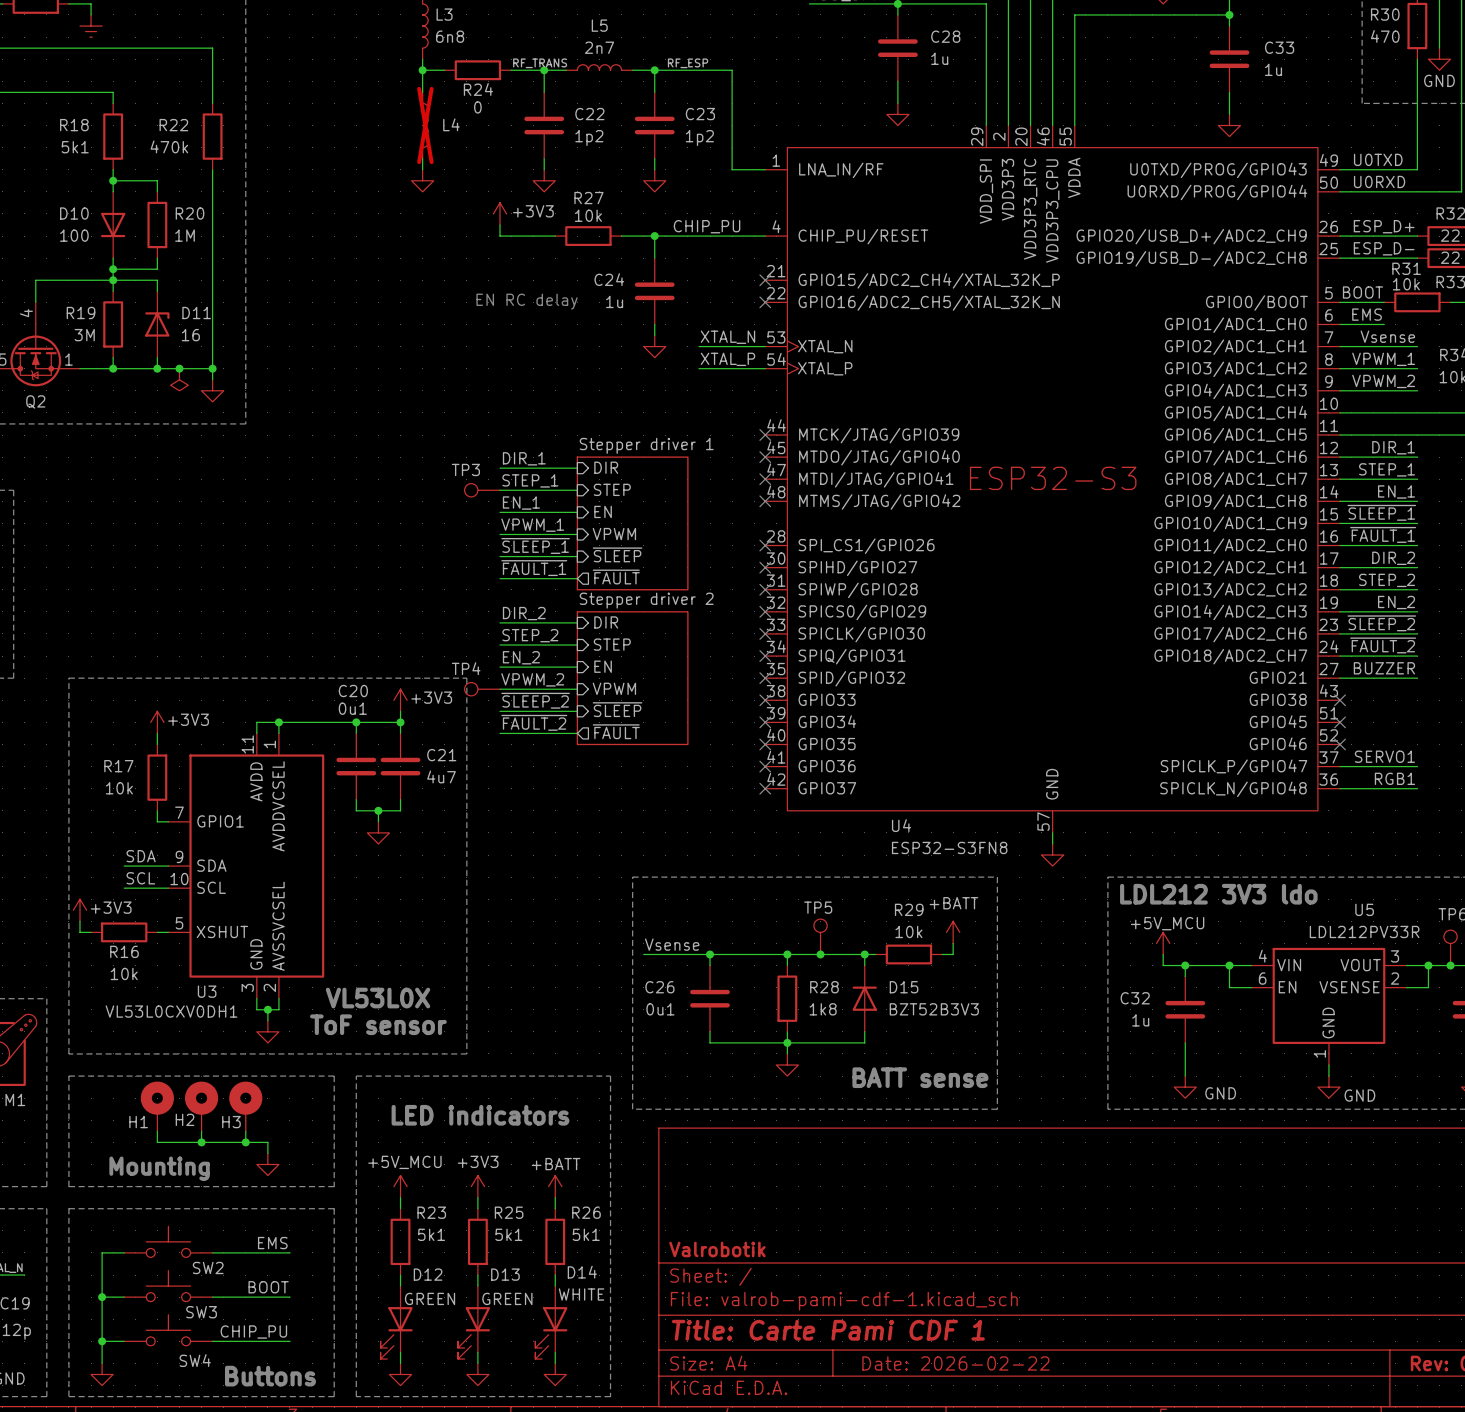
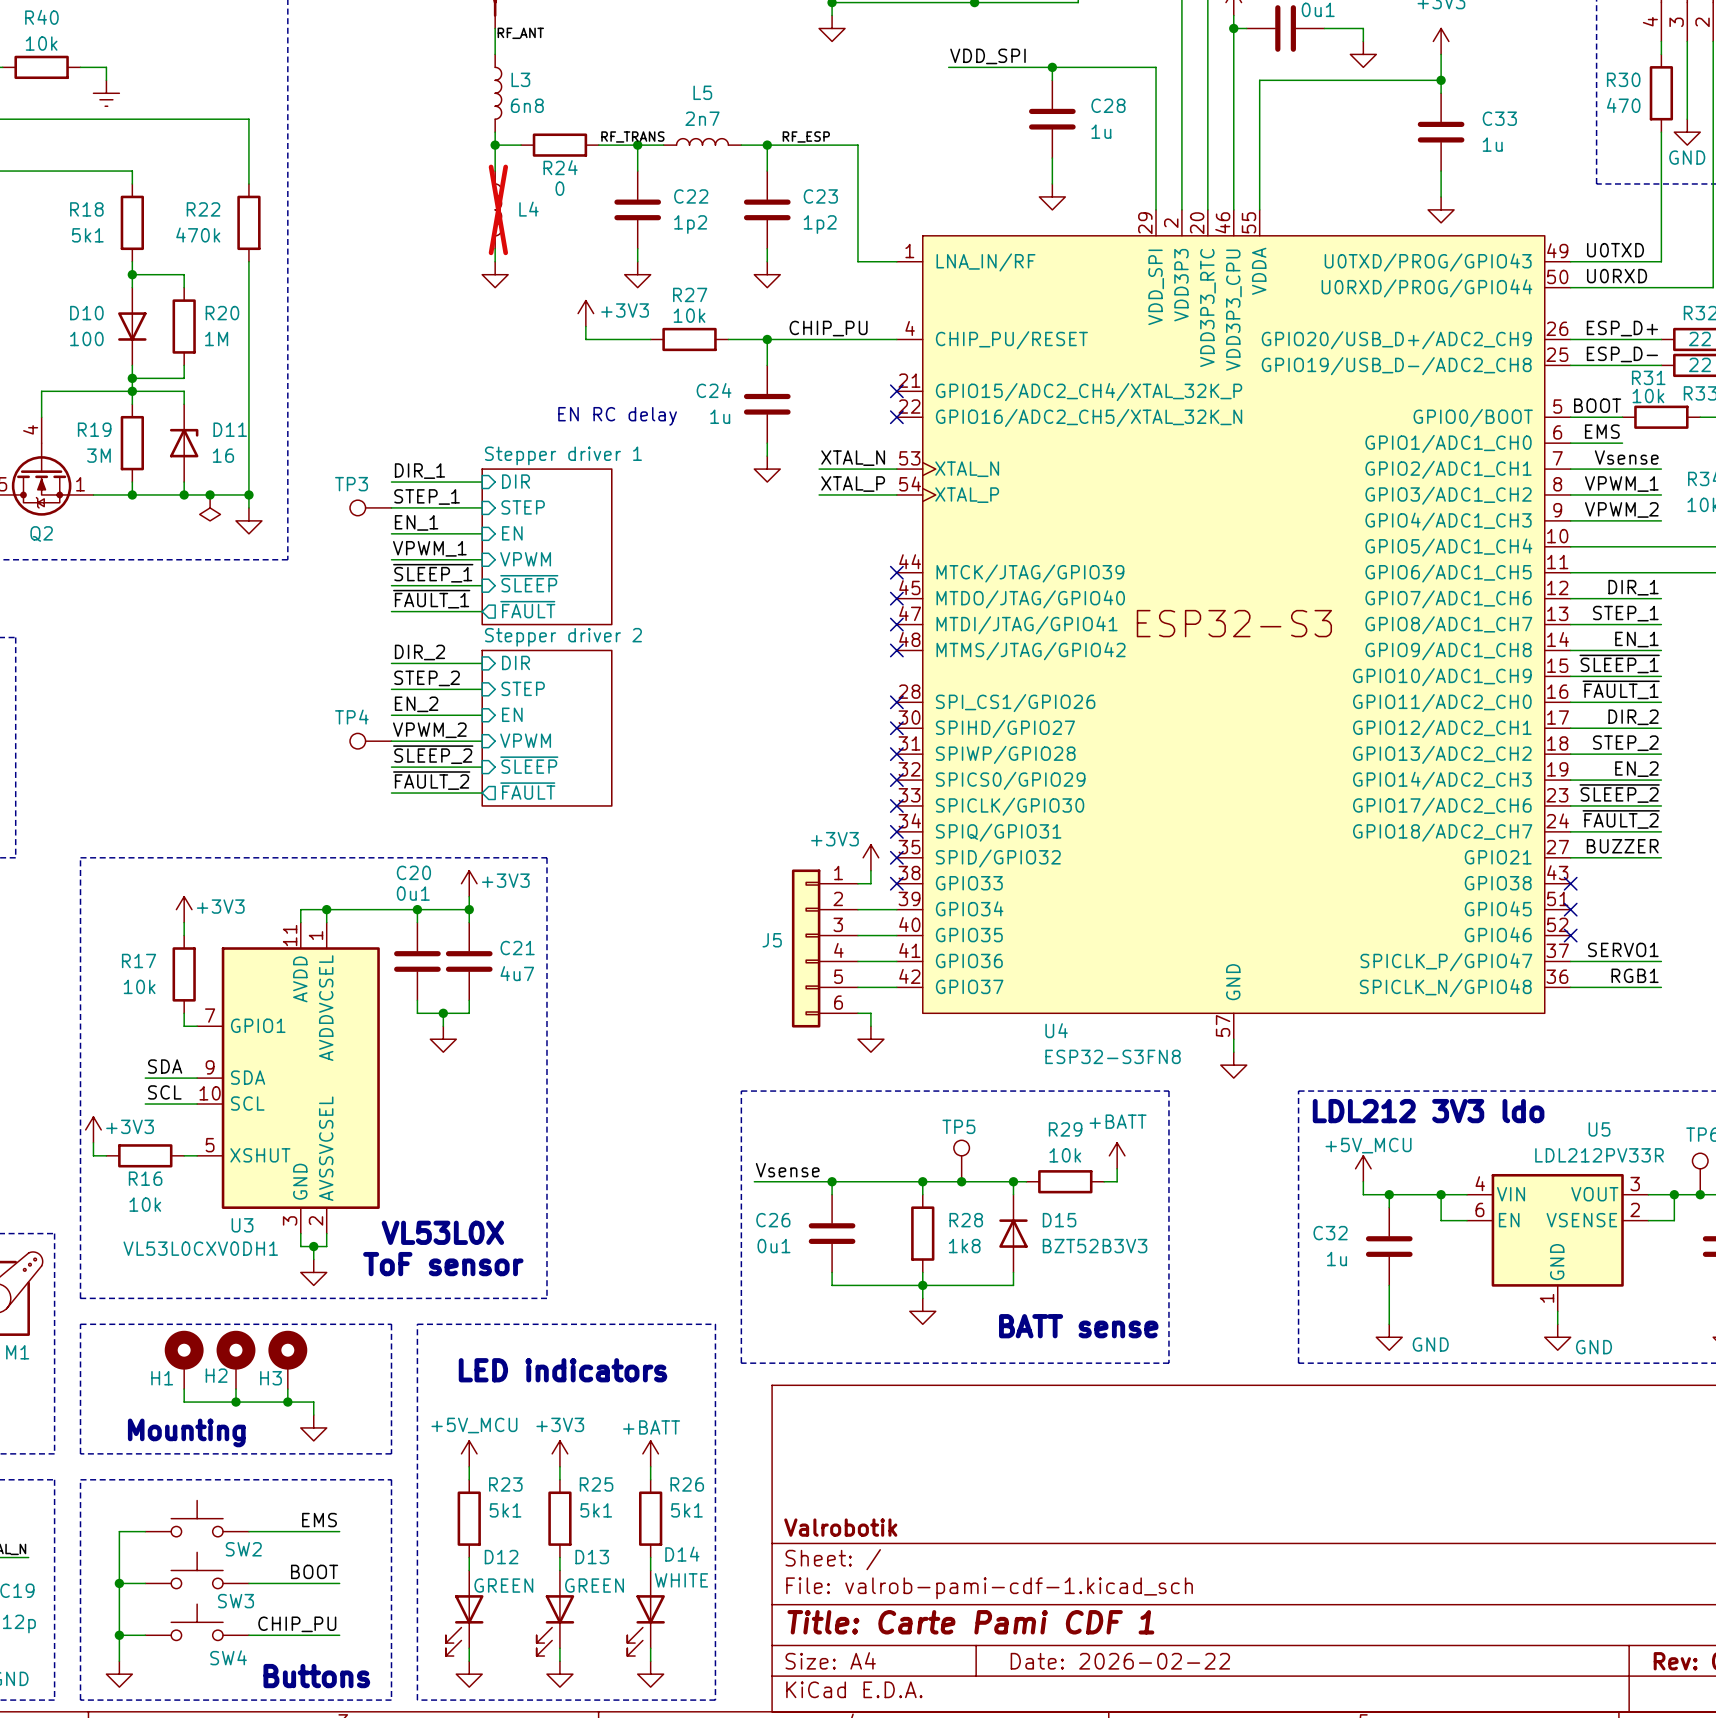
sheet pin: none -> DIR (516, 481)
sheet pin: none -> STEP (523, 507)
sheet pin: none -> EN (512, 533)
sheet pin: none -> VPWM (525, 559)
sheet pin: none -> ~{SLEEP} (529, 583)
label position: DIR_1 (524, 458) -> DIR_1 (419, 471)
sheet pin: none -> ~{FAULT} (527, 609)
sheet pin: DIR (606, 467) -> none
wire: (500, 468) (577, 468) -> (391, 482) (482, 482)
label position: STEP_1 (530, 480) -> STEP_1 (427, 496)
sheet pin: STEP (612, 489) -> none
TP3 position: (482, 490) -> (370, 507)
wire: (500, 490) (577, 490) -> (391, 507) (482, 507)
label position: EN_1 (521, 503) -> EN_1 (416, 522)
sheet pin: none -> DIR (516, 662)
sheet pin: EN (603, 511) -> none
wire: (500, 512) (577, 512) -> (391, 533) (482, 533)
sheet Stepper driver 1 position: (632, 523) -> (546, 546)
label position: VPWM_1 (532, 525) -> VPWM_1 (429, 548)
sheet pin: none -> STEP (523, 688)
wire: (500, 534) (577, 534) -> (391, 559) (482, 559)
sheet pin: VPWM (614, 534) -> none
label position: ~{SLEEP_1} (535, 545) -> ~{SLEEP_1} (433, 573)
sheet pin: ~{SLEEP} (617, 554) -> none
sheet pin: none -> EN (512, 714)
wire: (500, 556) (577, 556) -> (391, 585) (482, 585)
label position: ~{FAULT_1} (534, 568) -> ~{FAULT_1} (431, 599)
sheet pin: ~{FAULT} (616, 577) -> none
sheet pin: none -> VPWM (525, 740)
wire: (500, 578) (577, 578) -> (391, 611) (482, 611)
sheet pin: none -> ~{SLEEP} (529, 765)
label position: DIR_2 (524, 613) -> DIR_2 (419, 652)
sheet pin: none -> ~{FAULT} (527, 791)
wire: (500, 622) (577, 622) -> (391, 663) (482, 663)
sheet pin: DIR (606, 622) -> none
label position: STEP_2 (530, 635) -> STEP_2 (427, 678)
sheet pin: STEP (612, 644) -> none
wire: (500, 645) (577, 645) -> (391, 689) (482, 689)
label position: EN_2 (521, 657) -> EN_2 (416, 704)
sheet pin: EN (603, 666) -> none
wire: (500, 667) (577, 667) -> (391, 715) (482, 715)
sheet Stepper driver 2 position: (632, 678) -> (546, 728)
power symbol: none -> +3V3 (870, 857)
label position: VPWM_2 (532, 679) -> VPWM_2 (429, 730)
sheet pin: VPWM (614, 688) -> none
TP4 position: (482, 689) -> (370, 741)
wire: (500, 689) (577, 689) -> (391, 741) (482, 741)
wire: none -> (870, 870) (870, 883) (857, 883)
label position: ~{SLEEP_2} (535, 700) -> ~{SLEEP_2} (433, 754)
sheet pin: ~{SLEEP} (617, 709) -> none
wire: (500, 711) (577, 711) -> (391, 767) (482, 767)
label position: ~{FAULT_2} (534, 722) -> ~{FAULT_2} (431, 780)
wire: none -> (857, 909) (896, 909)
no-connect mark: (765, 722) -> none
sheet pin: ~{FAULT} (616, 731) -> none
wire: (500, 733) (577, 733) -> (391, 793) (482, 793)
wire: none -> (857, 935) (896, 935)
no-connect mark: (765, 744) -> none
J5: none -> (824, 948)
wire: none -> (857, 961) (896, 961)
no-connect mark: (765, 766) -> none
wire: none -> (857, 987) (896, 987)
no-connect mark: (765, 788) -> none
wire: none -> (857, 1013) (870, 1013) (870, 1026)
power symbol: none -> (870, 1039)

